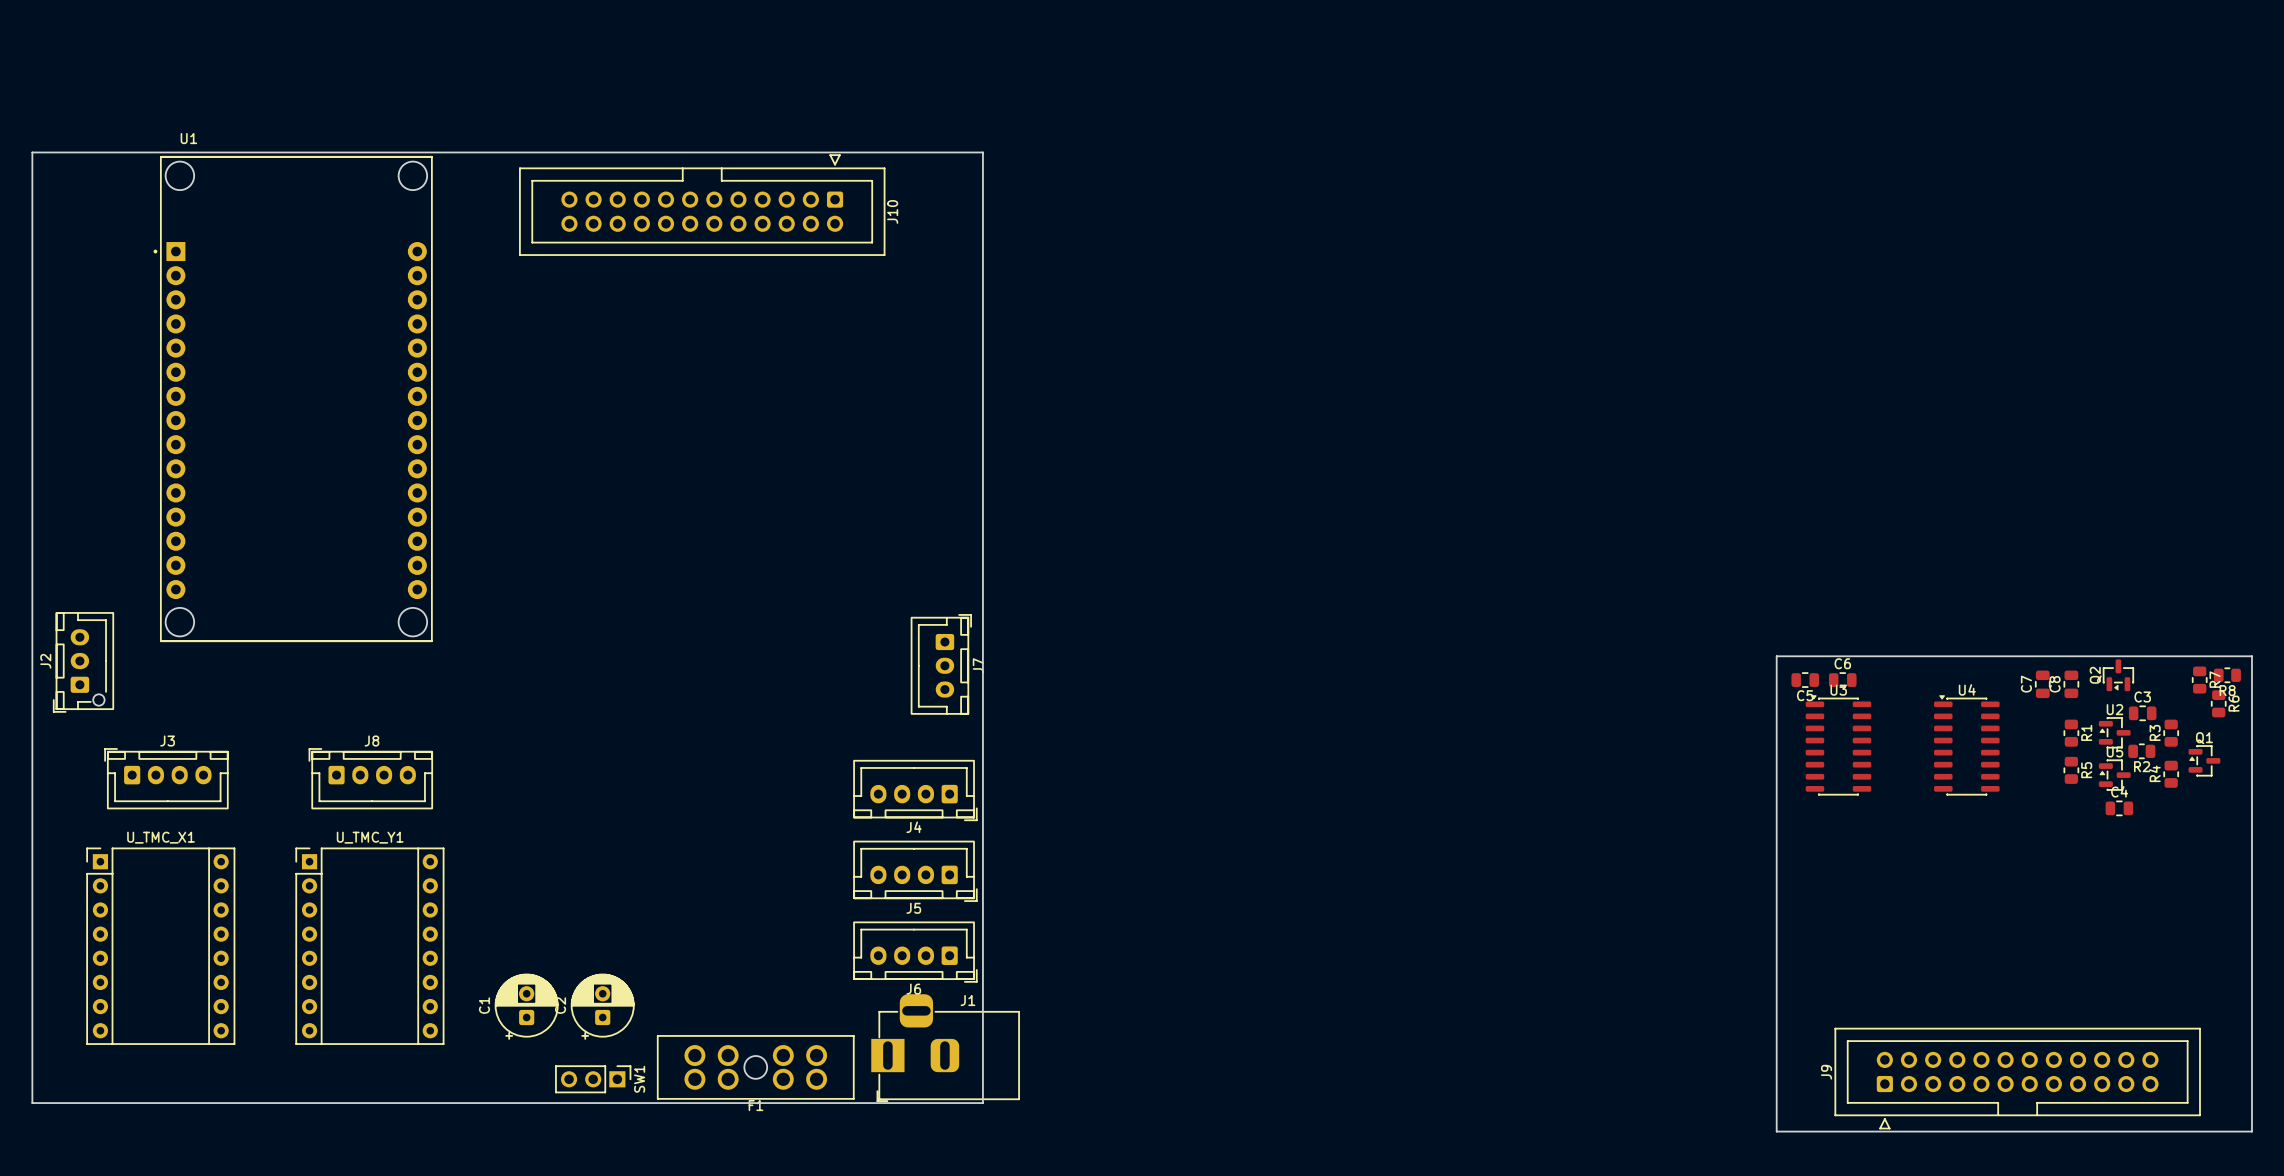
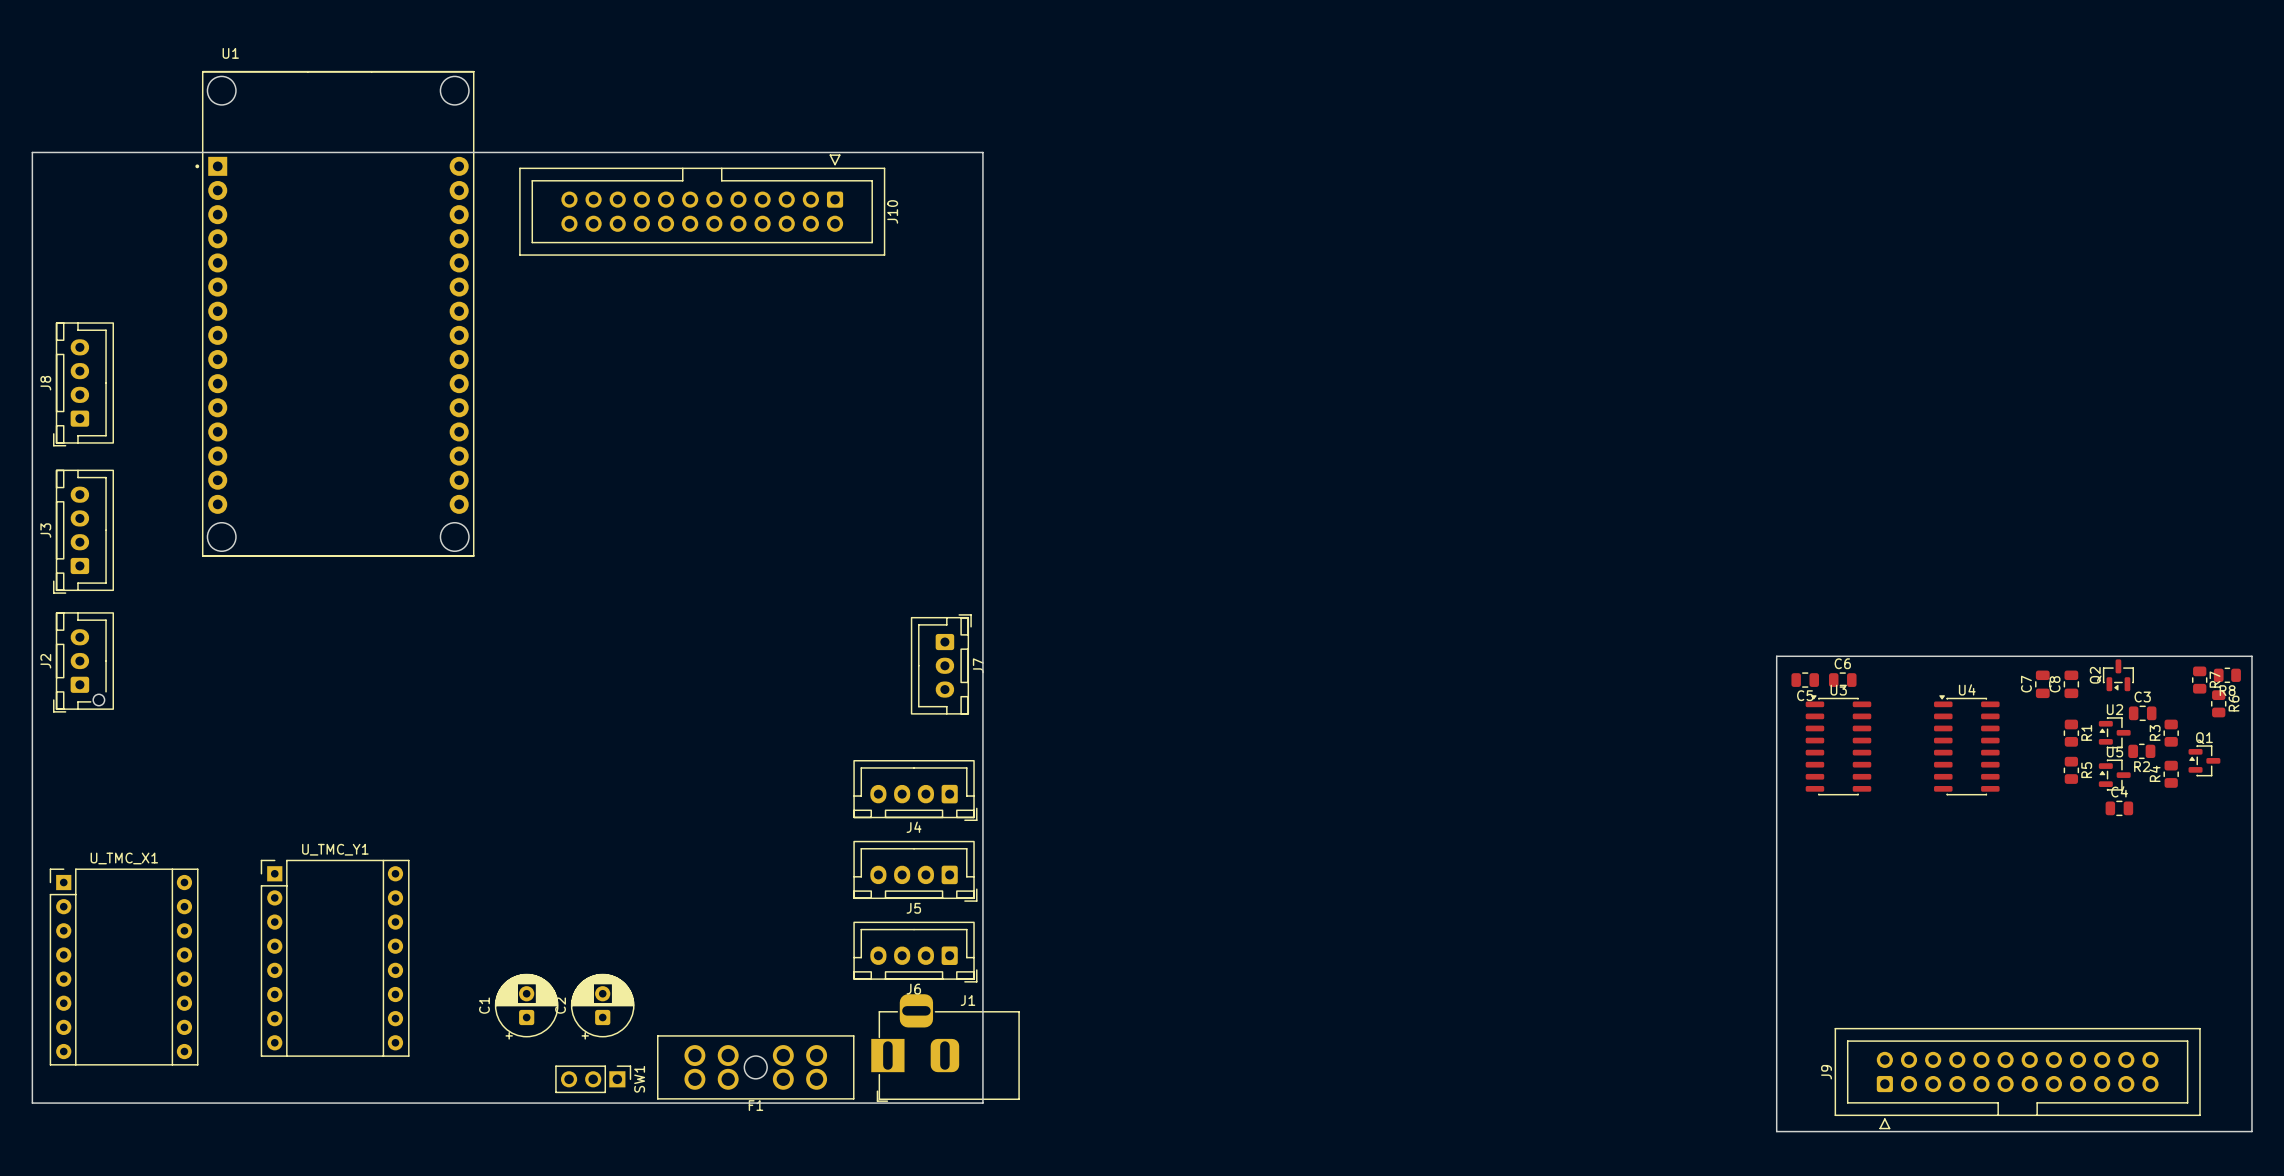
U1 position: (293, 399) -> (334, 313)
J3 rotation: 0° (166, 778) -> 90° counterclockwise (83, 531)
J3 position: (166, 778) -> (83, 531)
J8 rotation: 0° (370, 778) -> 90° counterclockwise (83, 384)
J8 position: (370, 778) -> (83, 384)
U_TMC_X1 position: (160, 946) -> (124, 967)
U_TMC_Y1 position: (369, 946) -> (335, 958)

